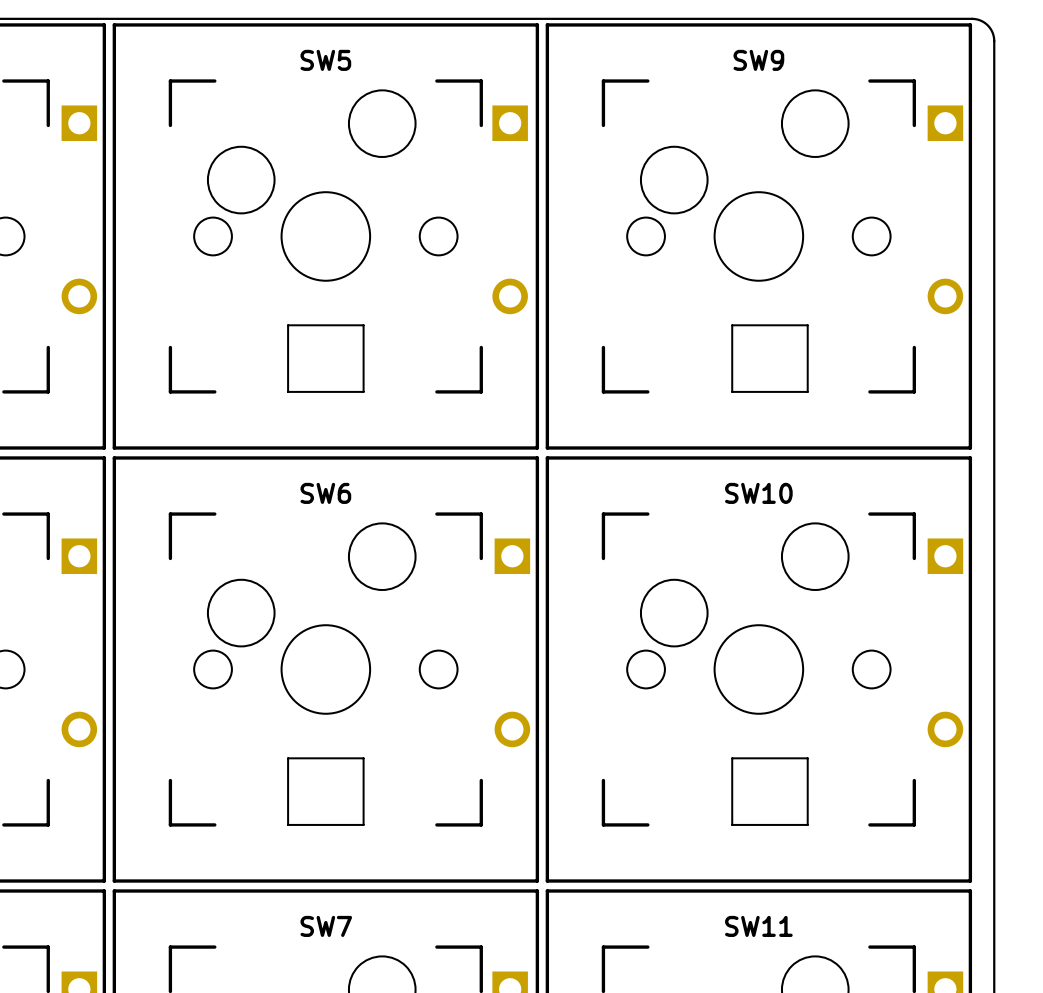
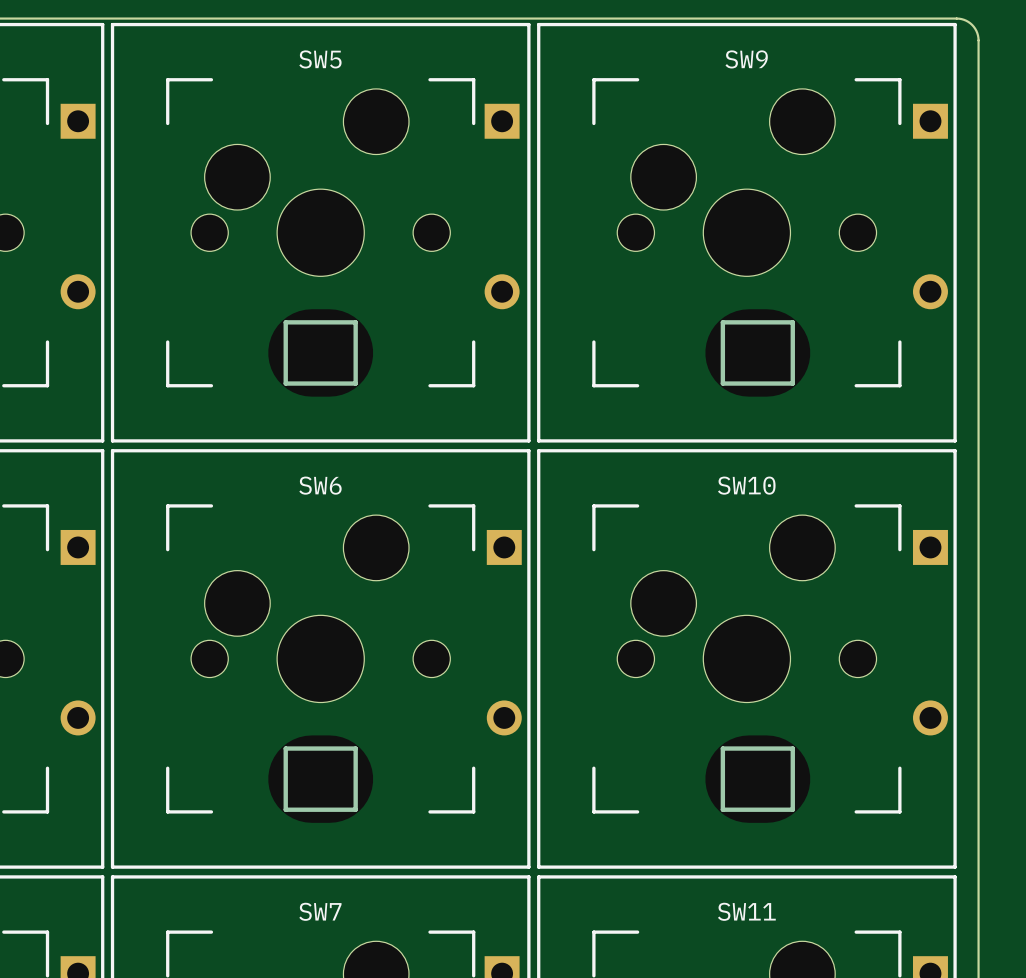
part footprint: [287, 324, 365, 393] -> [268, 309, 374, 397]
part footprint: [731, 324, 809, 393] -> [705, 309, 811, 397]
part footprint: [287, 757, 365, 826] -> [268, 735, 374, 823]
part footprint: [731, 757, 809, 826] -> [705, 735, 811, 823]

